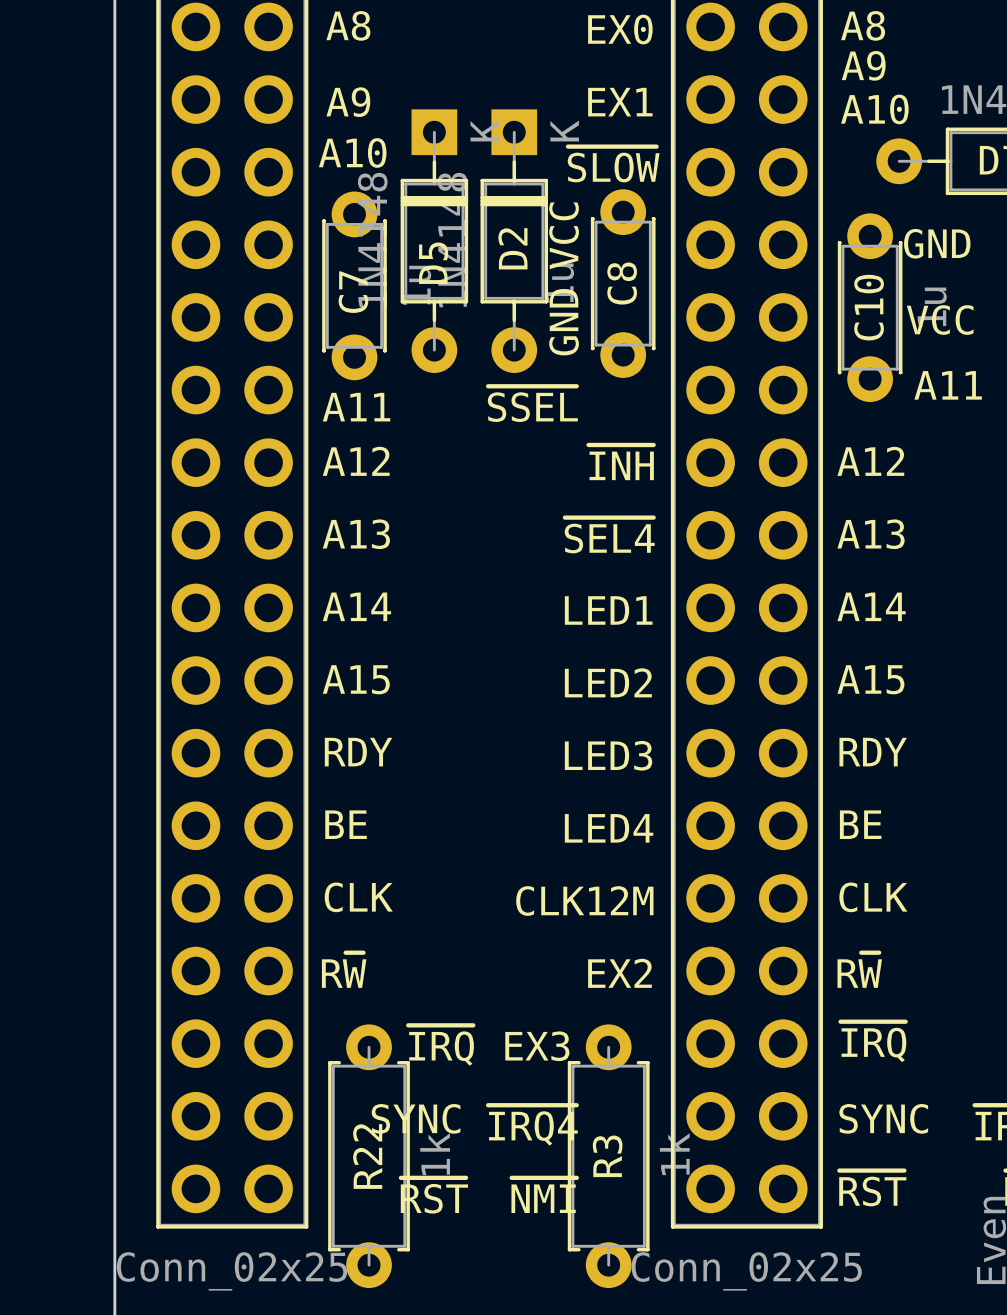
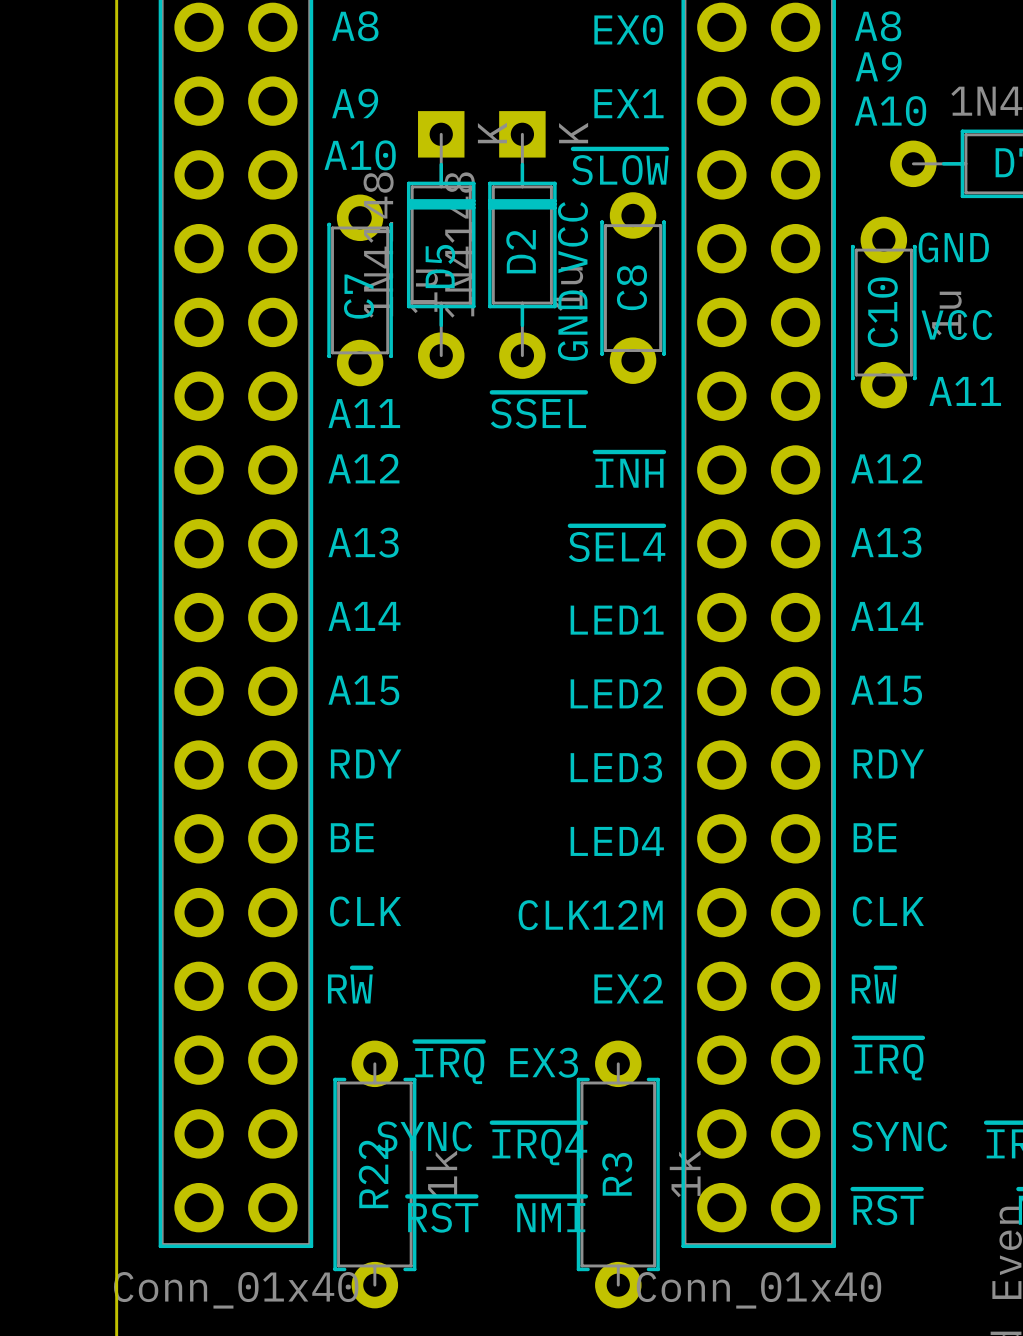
part value: Conn_02x25 (232, 1271) -> Conn_01x40 (236, 1290)
part value: Conn_02x25 (746, 1271) -> Conn_01x40 (759, 1290)

